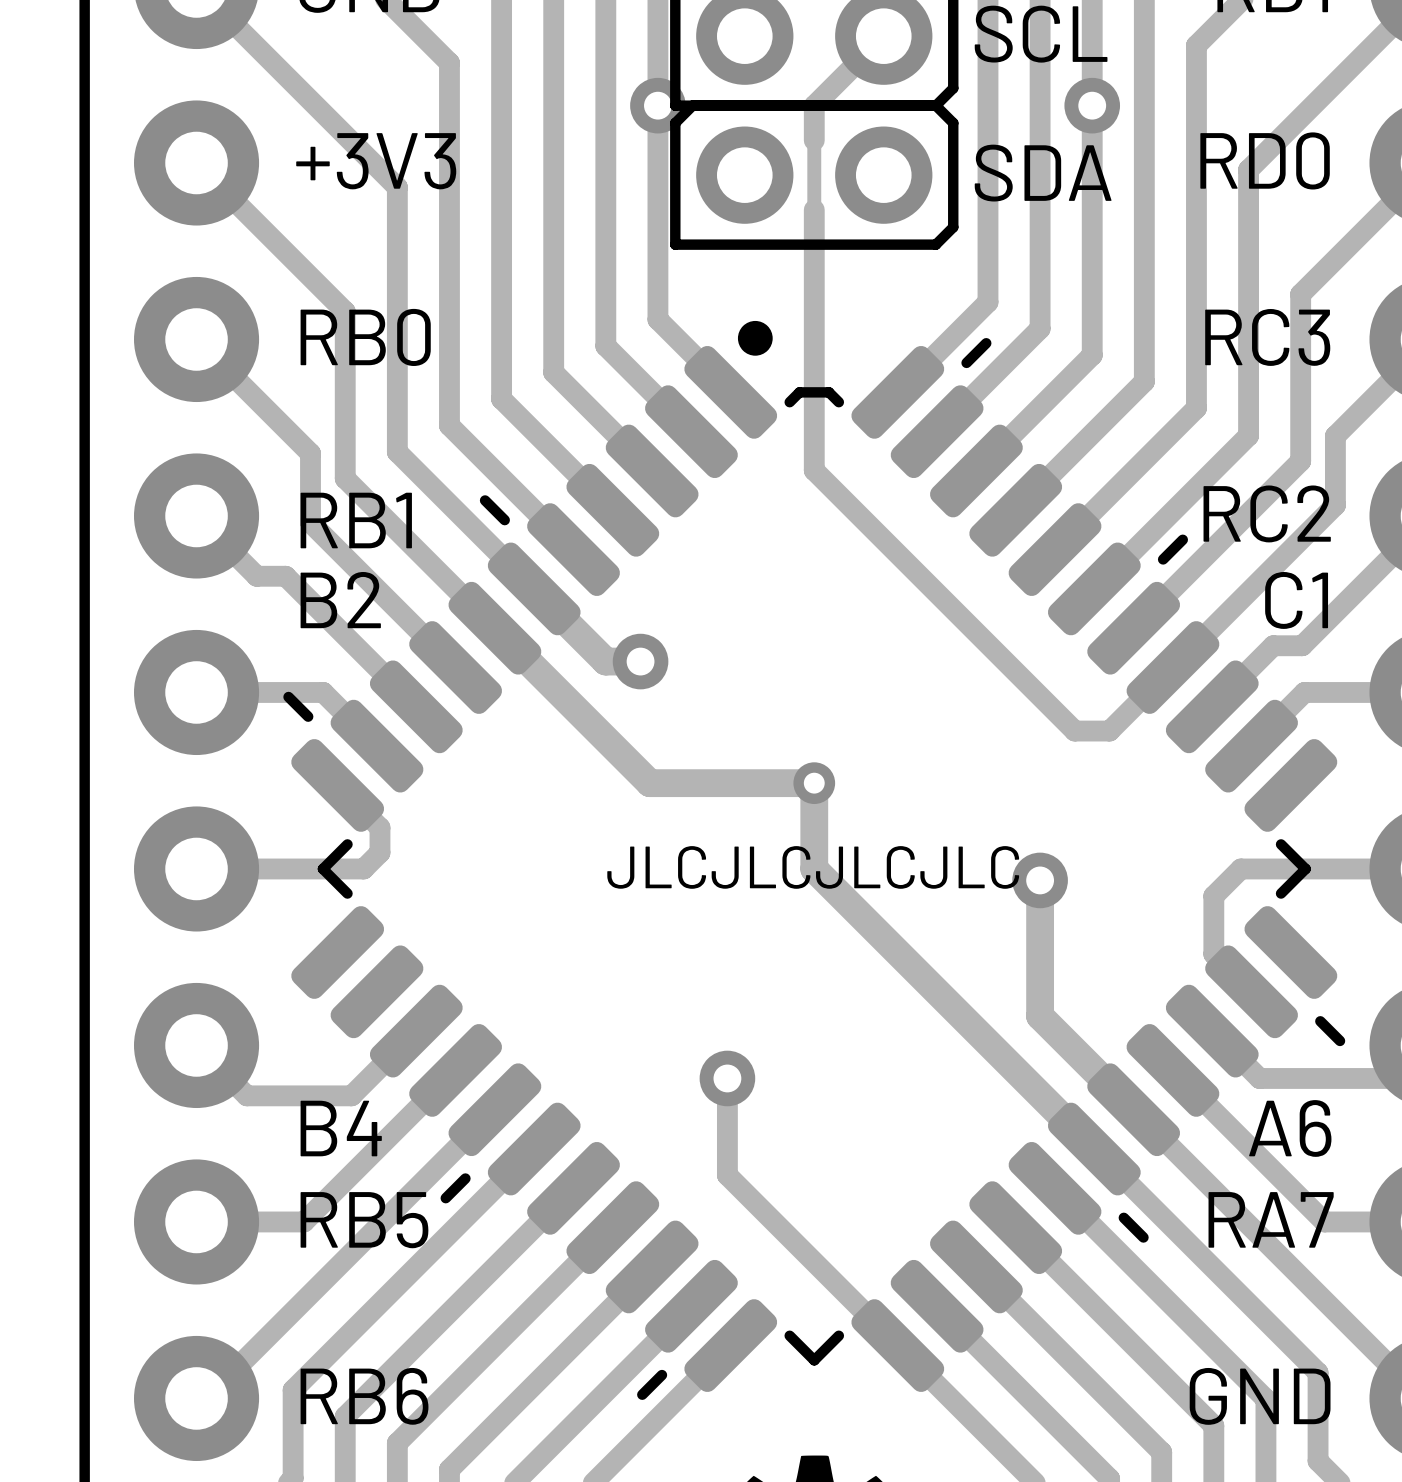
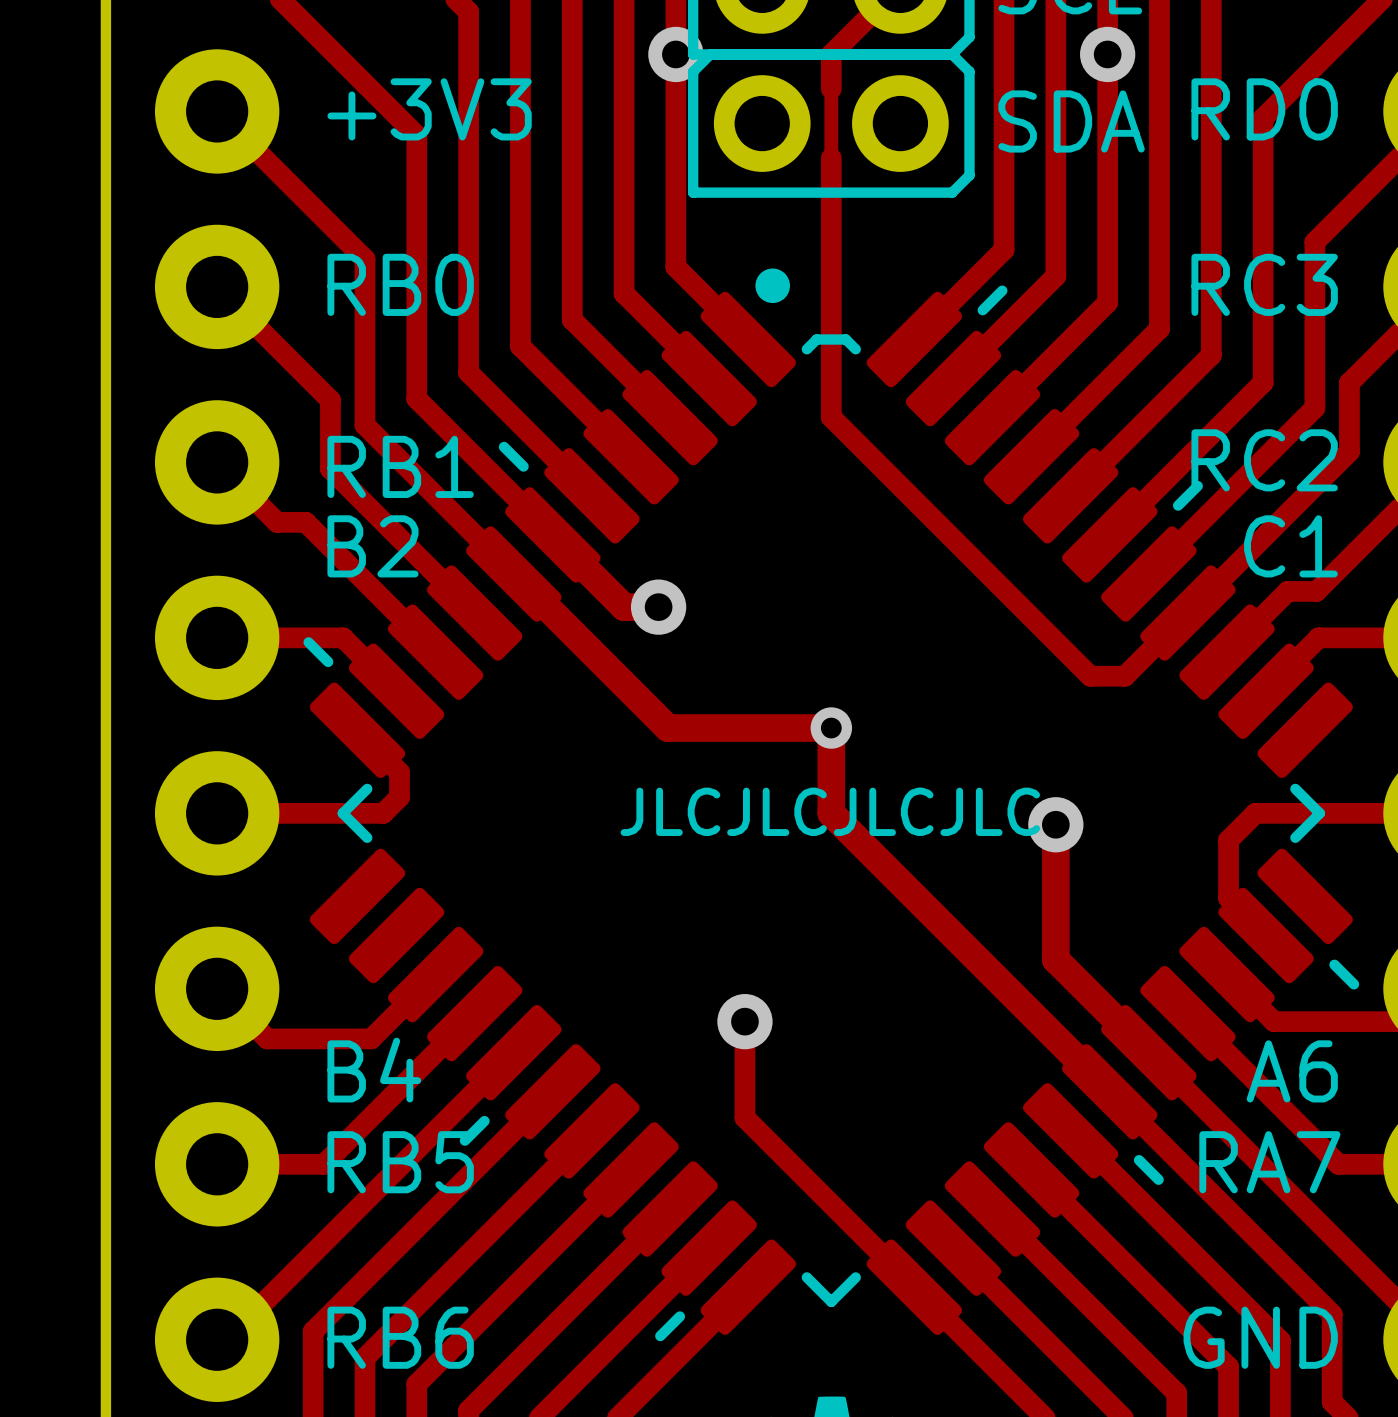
part footprint: [283, 320, 1346, 1400] -> [303, 268, 1360, 1342]

